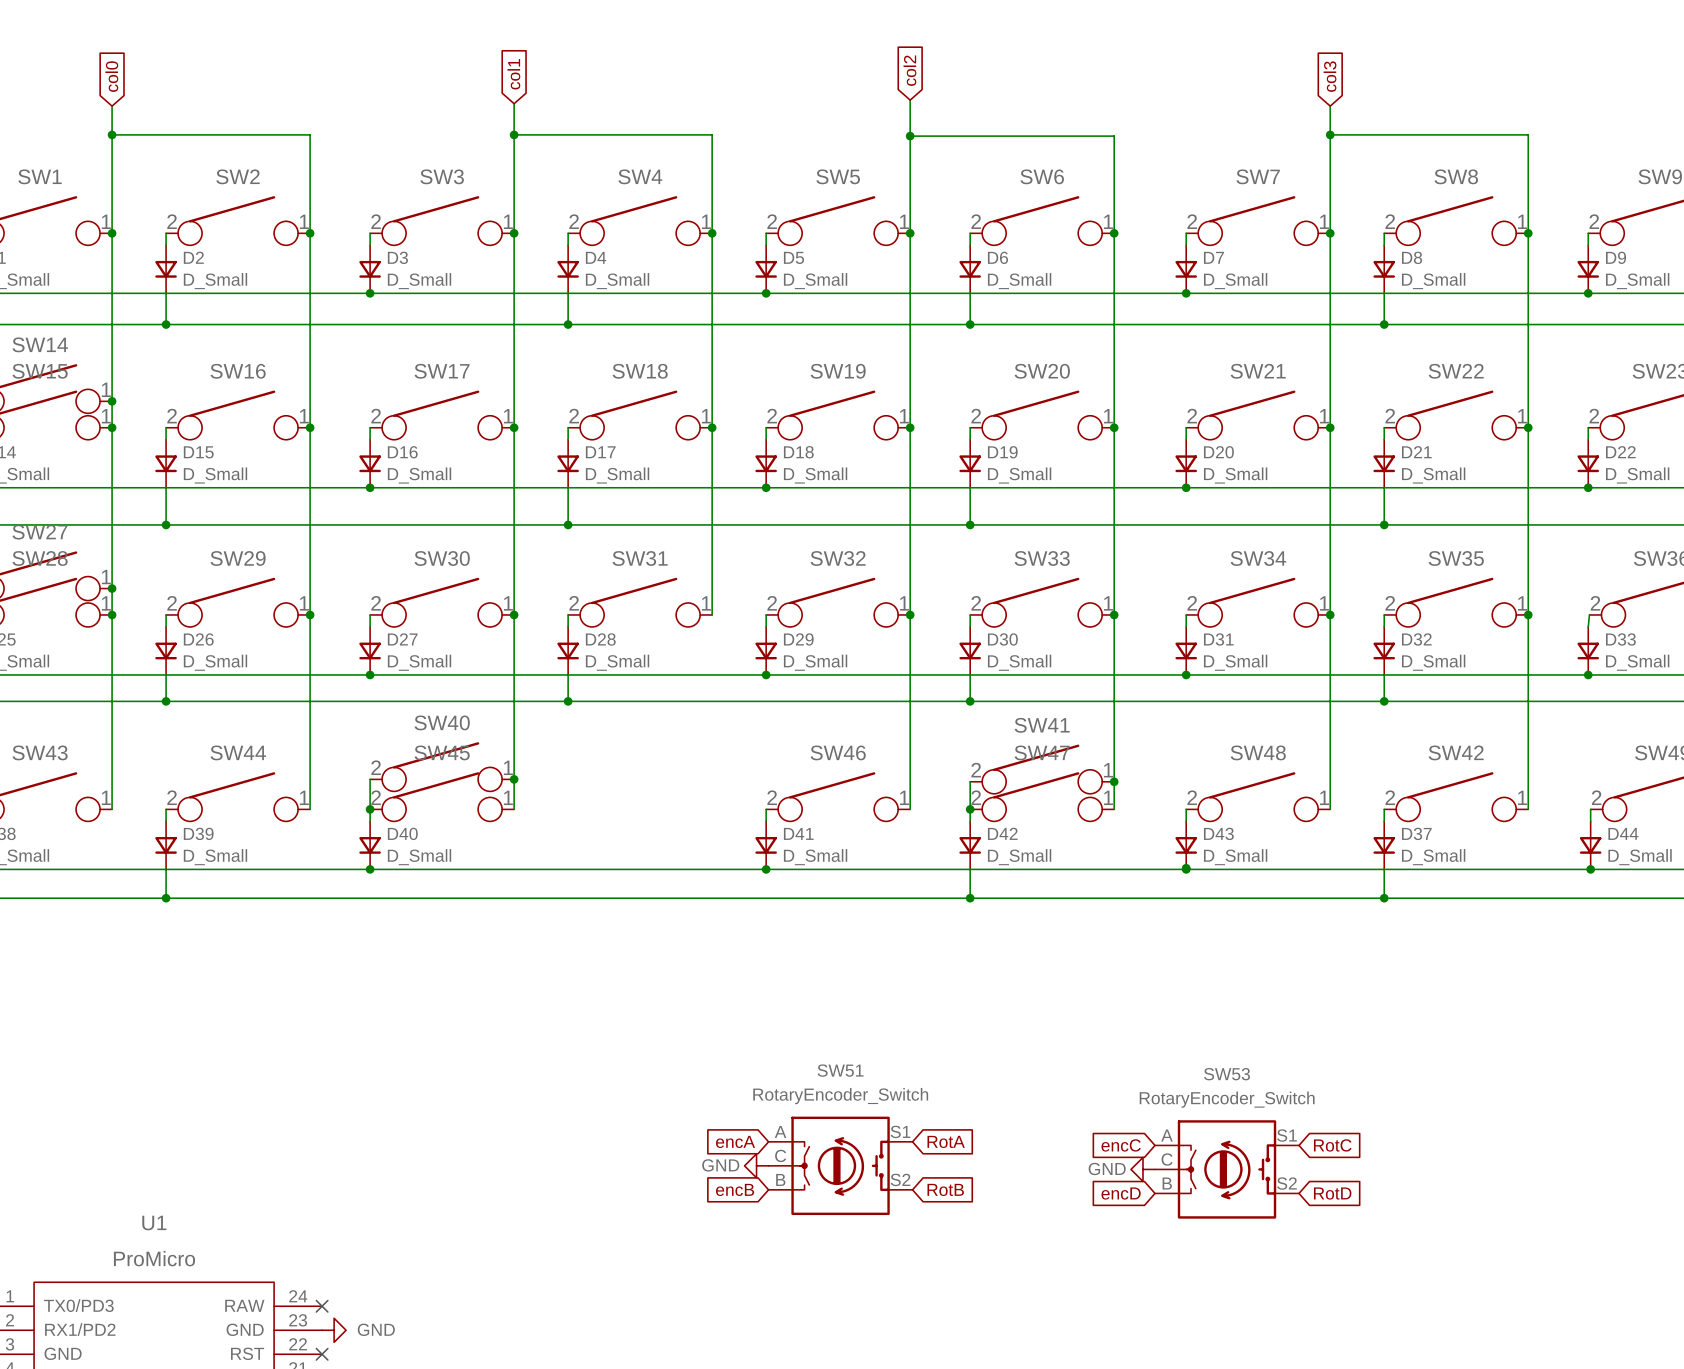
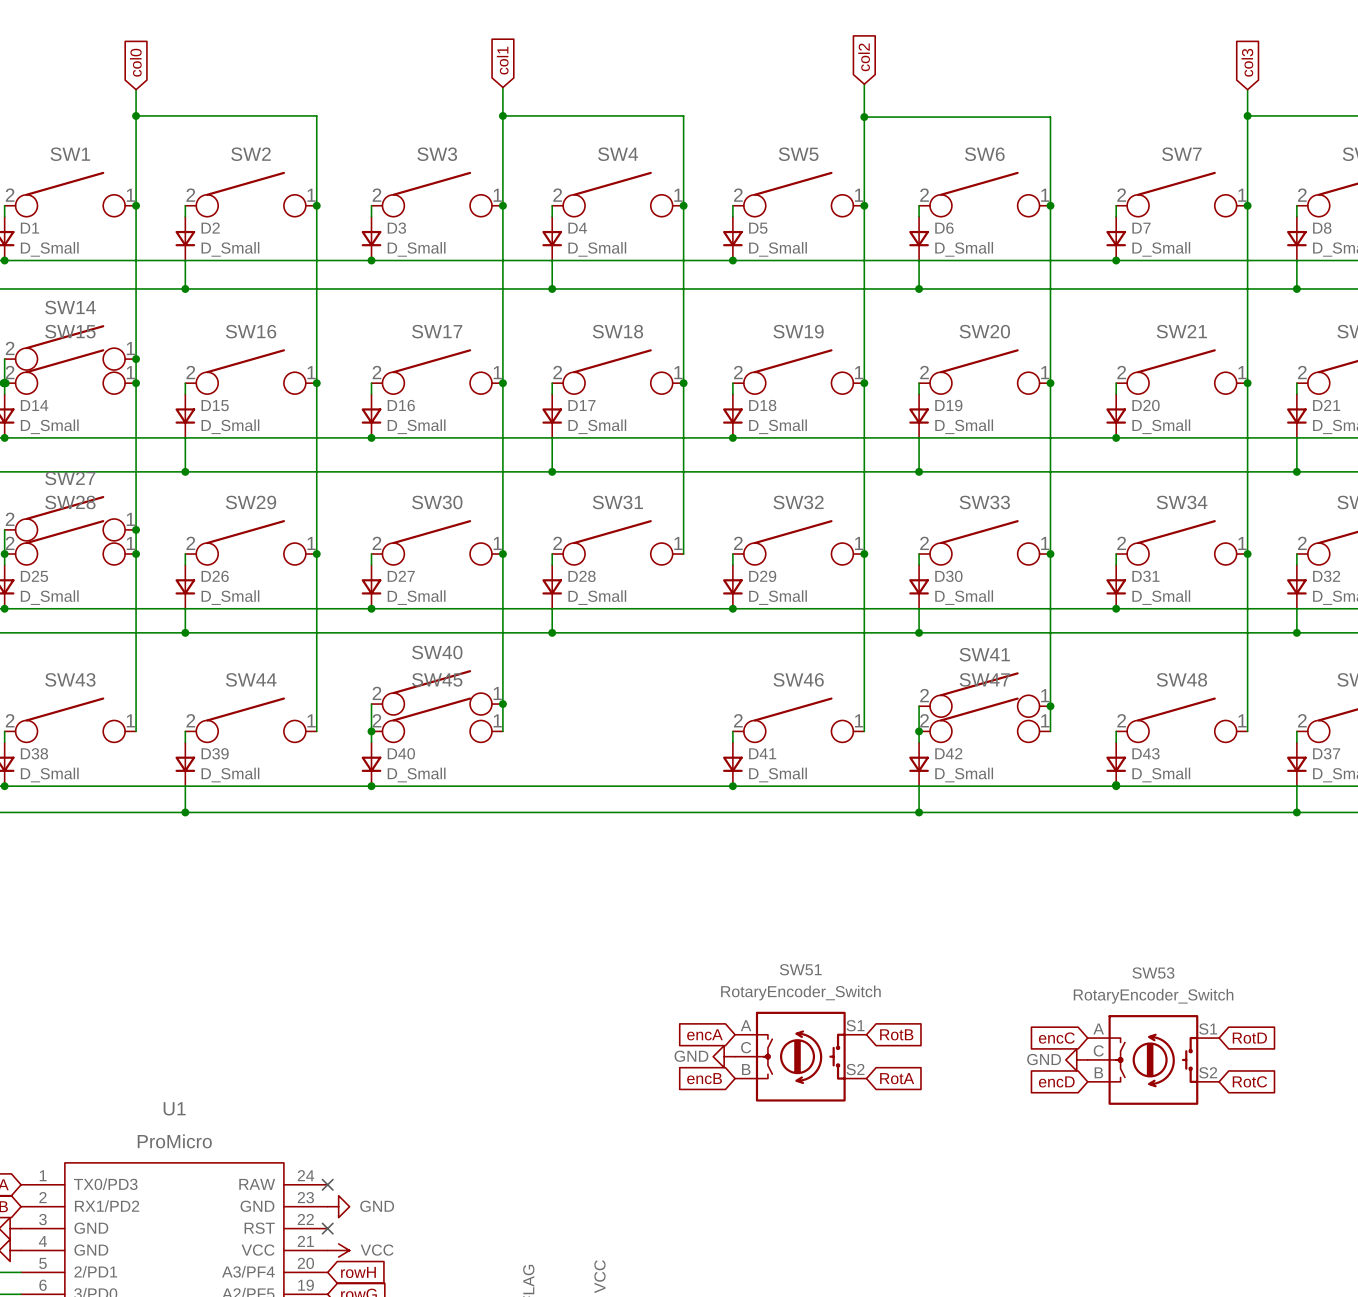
global label: RotA (946, 1141) -> RotB (896, 1034)
global label: RotC (1332, 1145) -> RotD (1249, 1038)
global label: RotB (945, 1189) -> RotA (897, 1078)
global label: RotD (1332, 1193) -> RotC (1249, 1081)

